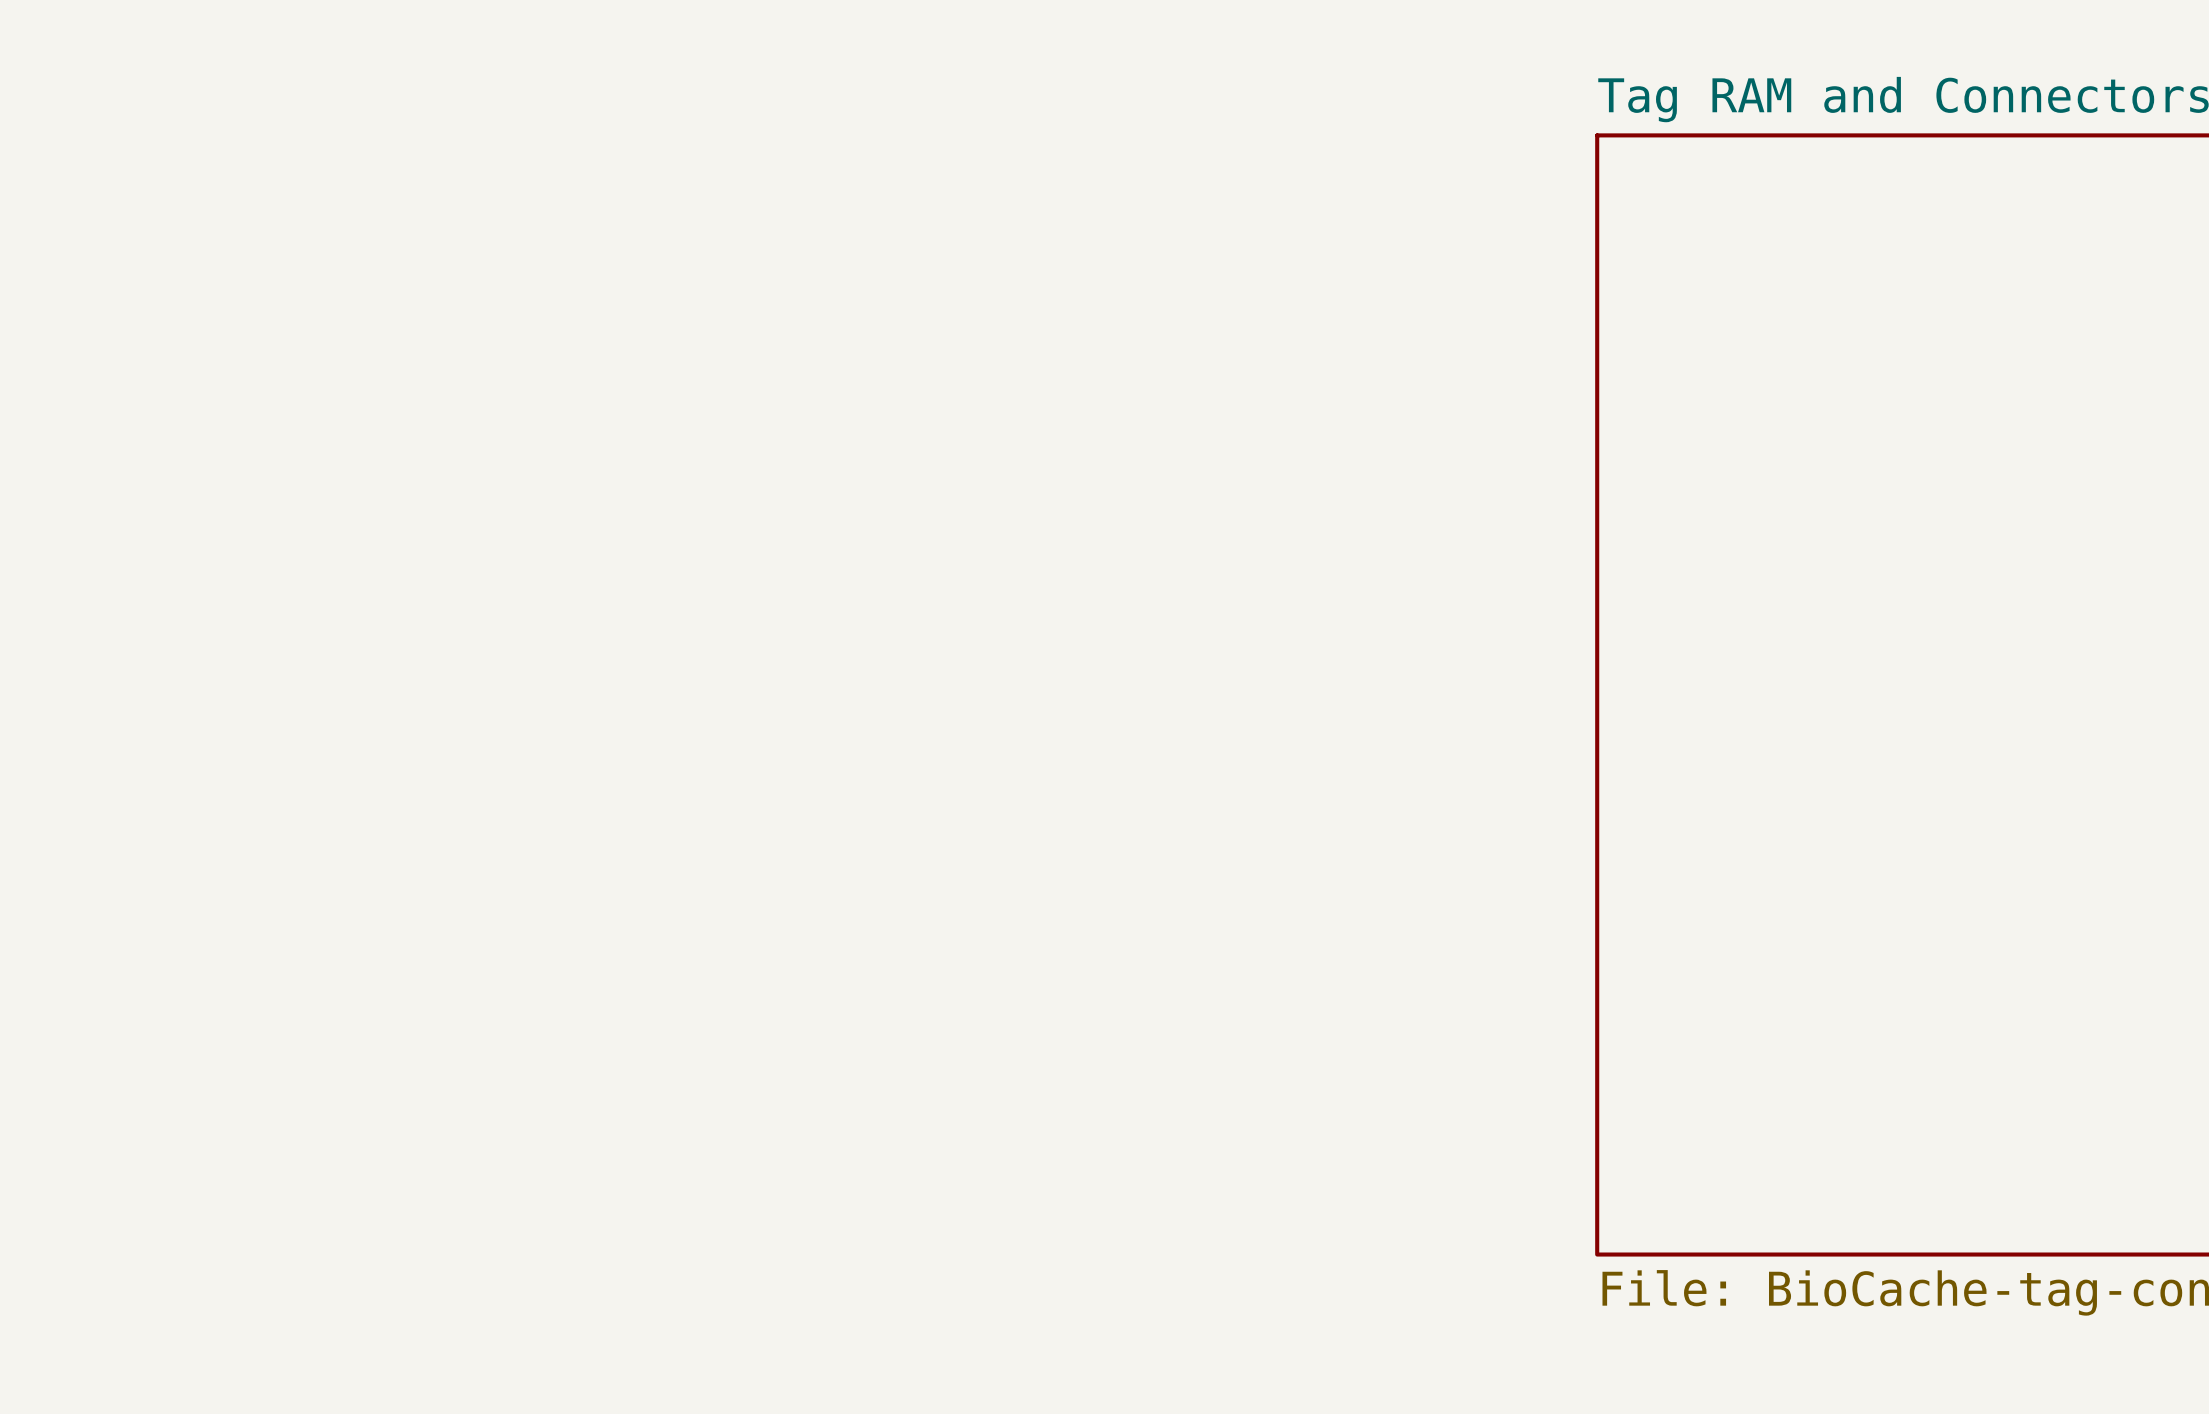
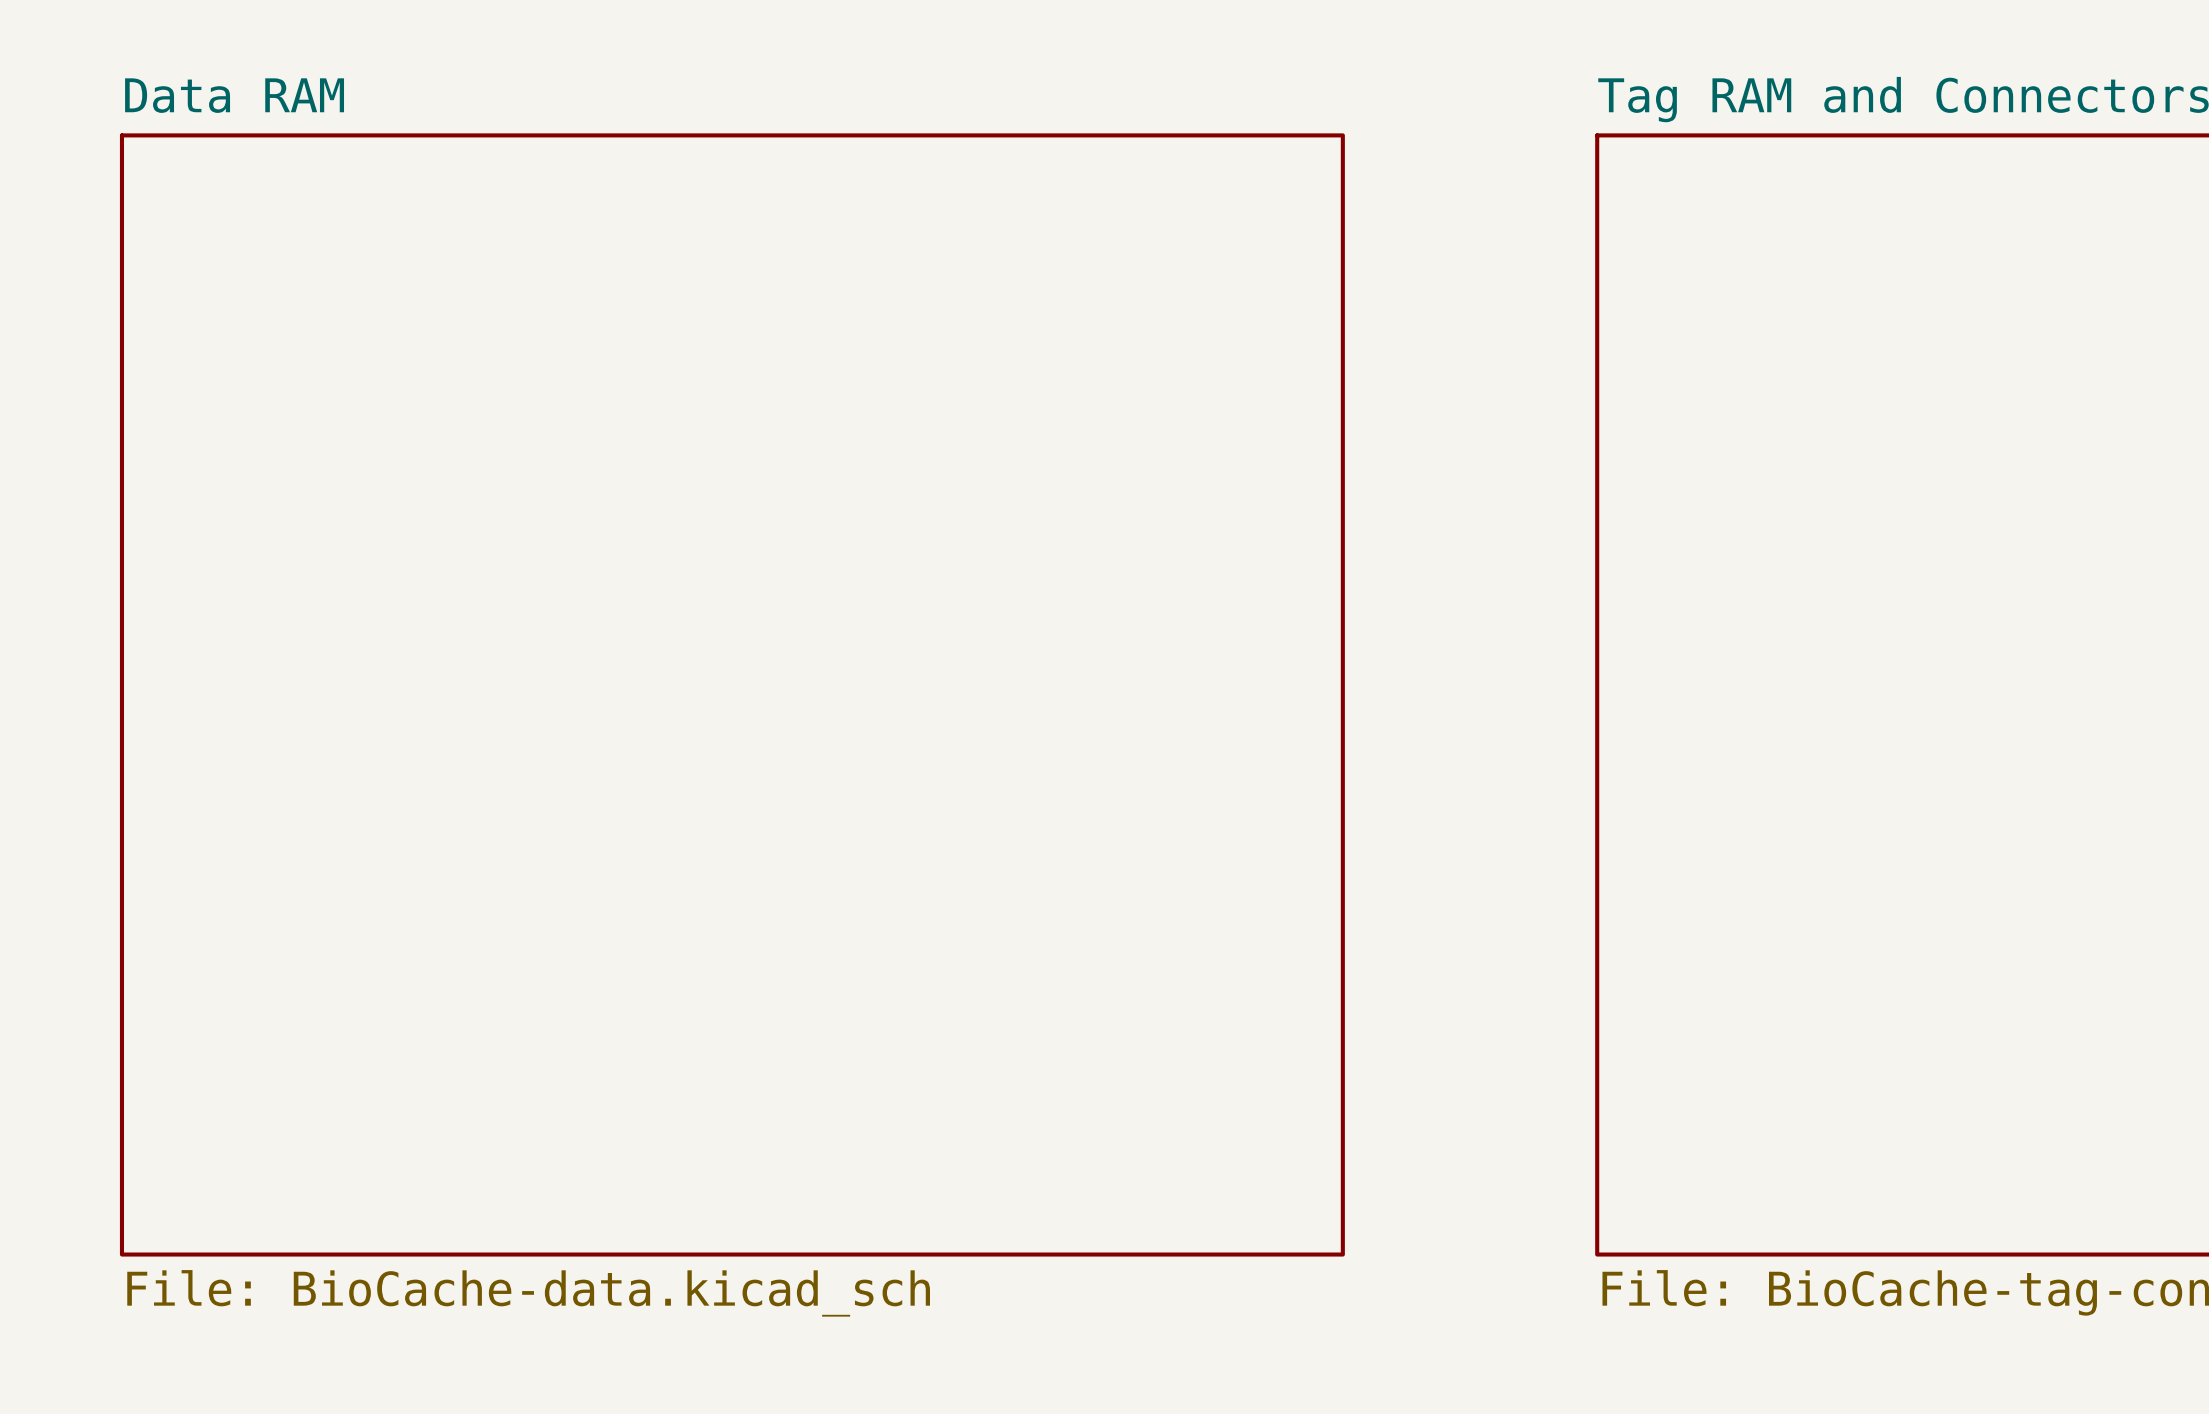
sheet Data RAM: none -> File: BioCache-data.kicad_sch (732, 694)

